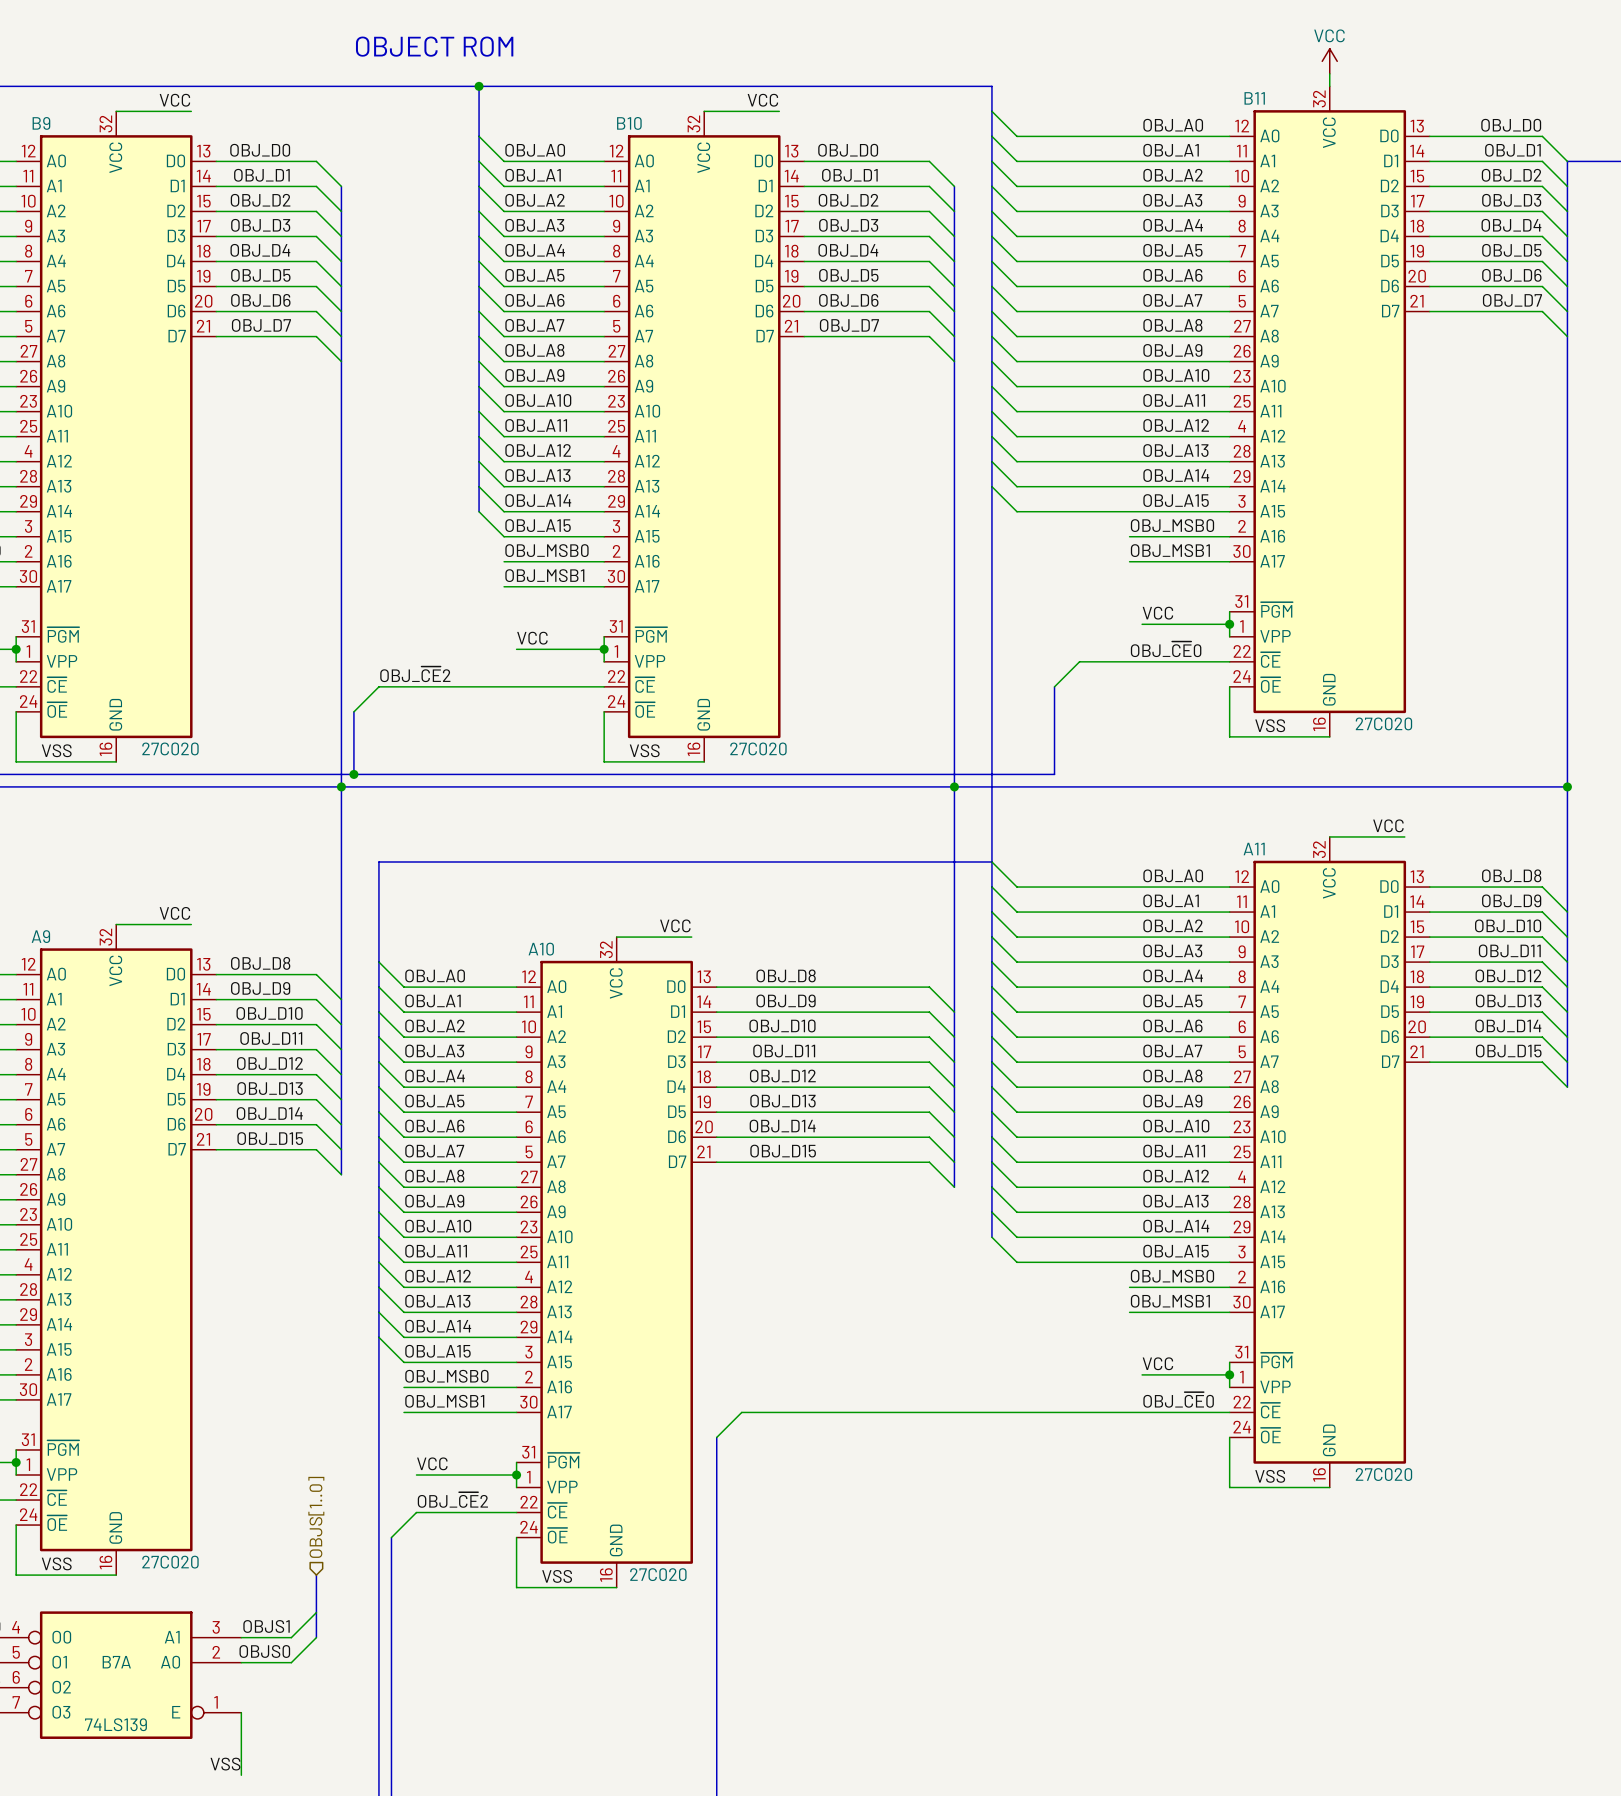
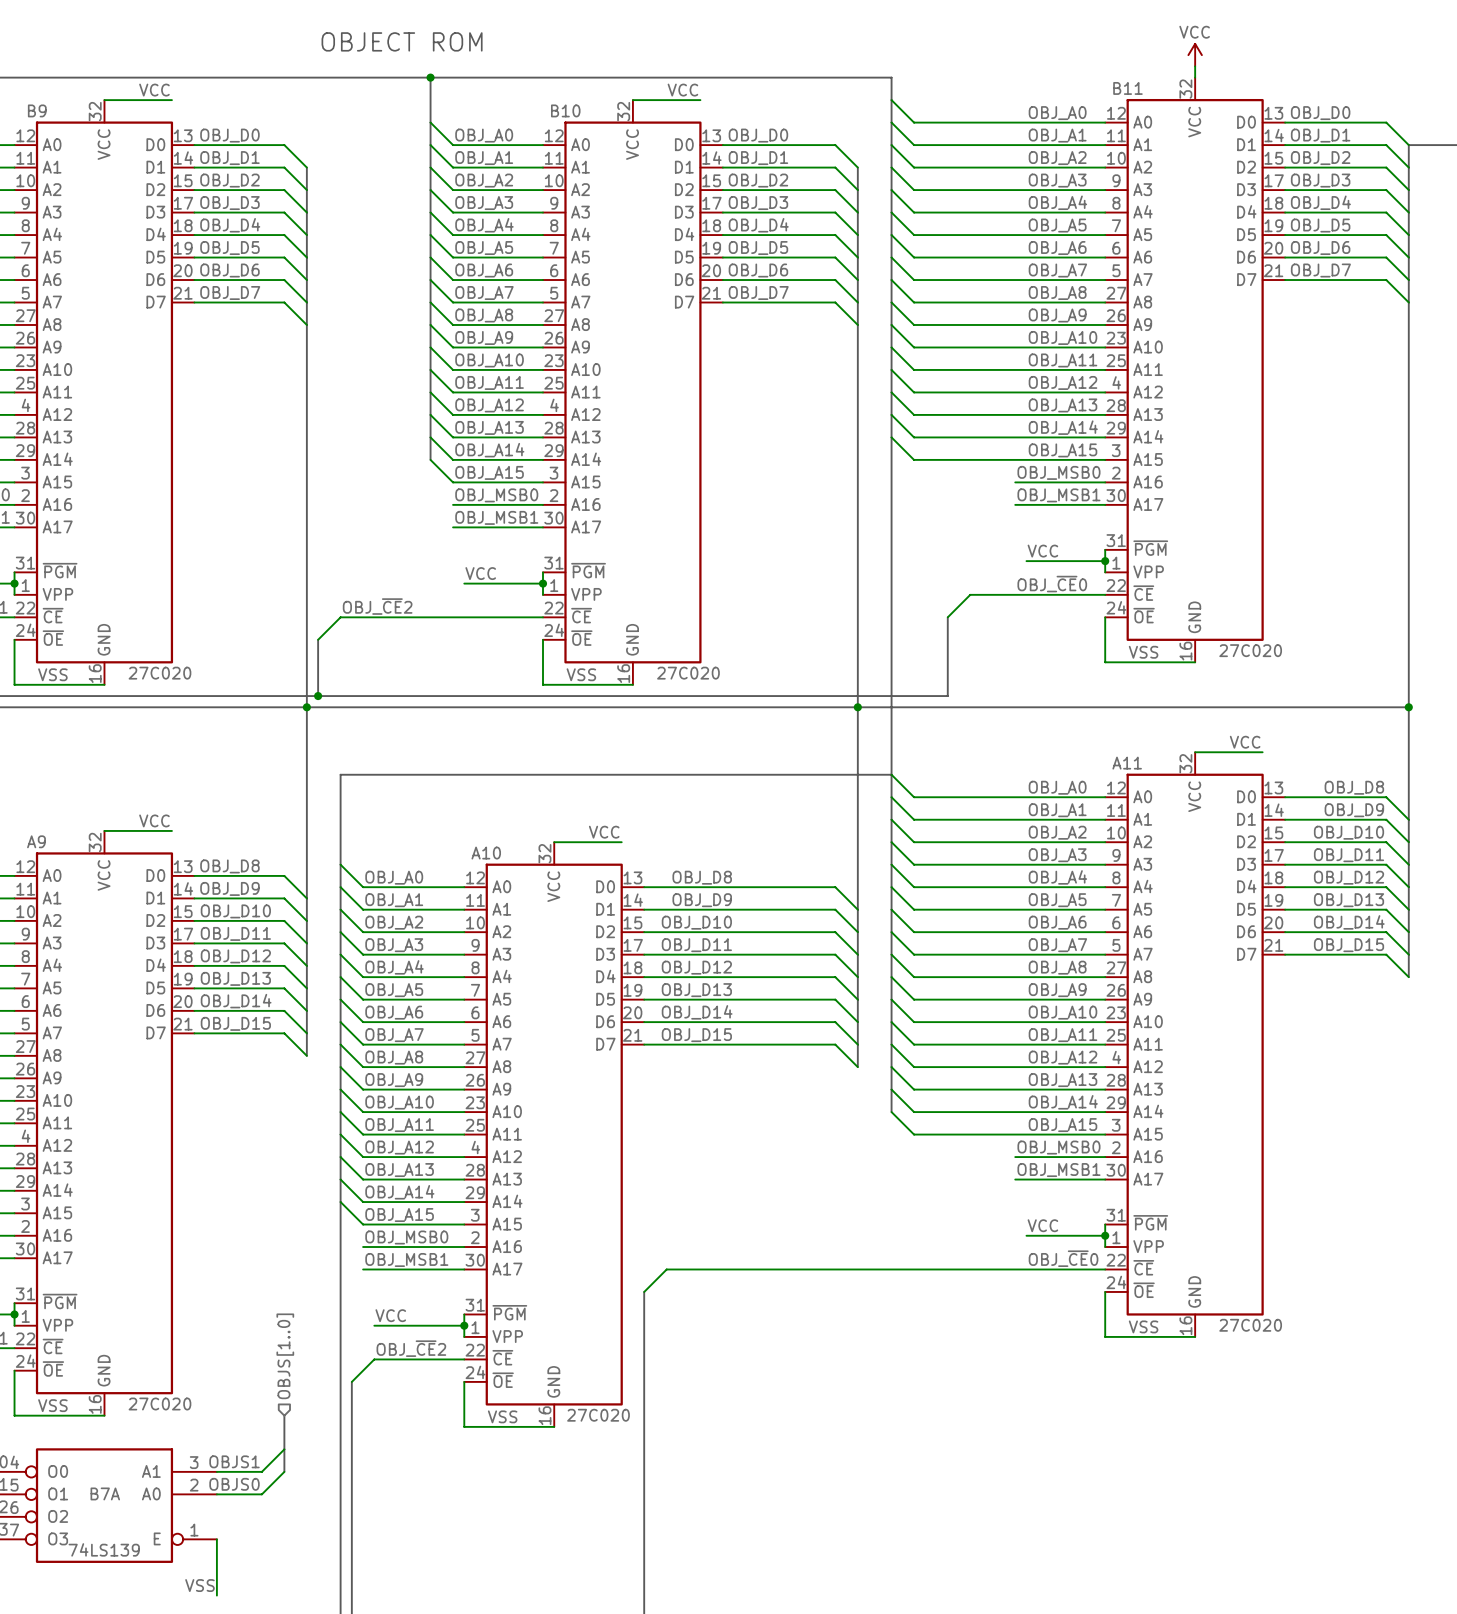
label position: OBJ_D0 (1511, 125) -> OBJ_D0 (1320, 113)
label position: OBJ_D1 (1512, 150) -> OBJ_D1 (1320, 135)
label position: OBJ_D2 (1511, 175) -> OBJ_D2 (1320, 158)
label position: OBJ_D3 (1511, 200) -> OBJ_D3 (1320, 180)
label position: OBJ_D4 (1511, 225) -> OBJ_D4 (1320, 202)
label position: OBJ_D5 (1511, 250) -> OBJ_D5 (1320, 225)
label position: OBJ_D6 (1511, 275) -> OBJ_D6 (1320, 248)
label position: OBJ_D7 (1512, 300) -> OBJ_D7 (1320, 270)

